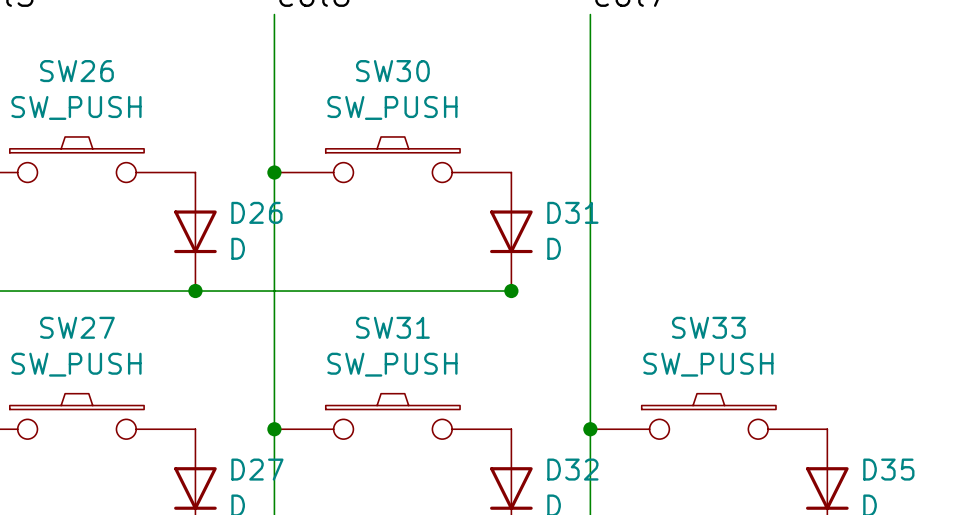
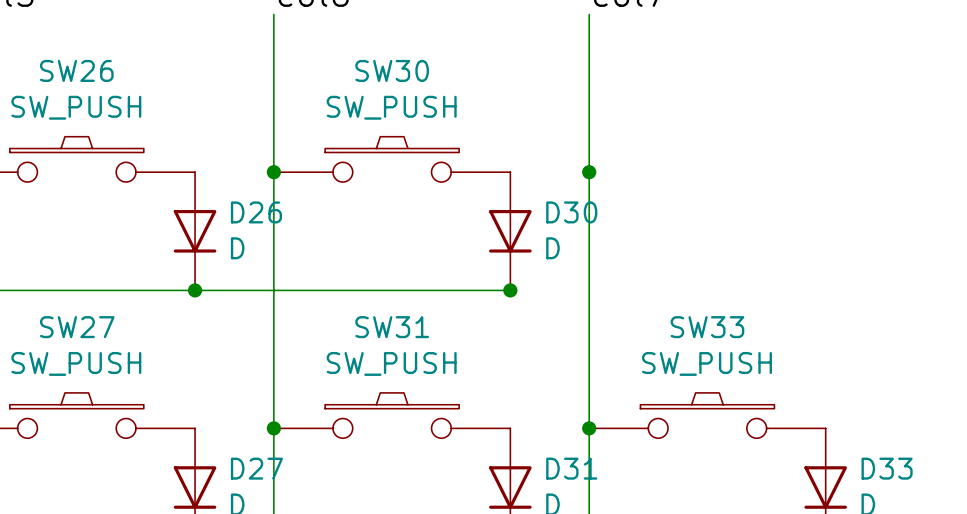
junction: none -> (589, 172)
D31 name: D31 (572, 212) -> D30 (571, 212)
D32 name: D32 (572, 469) -> D31 (571, 468)
D35 name: D35 (888, 469) -> D33 (887, 468)

